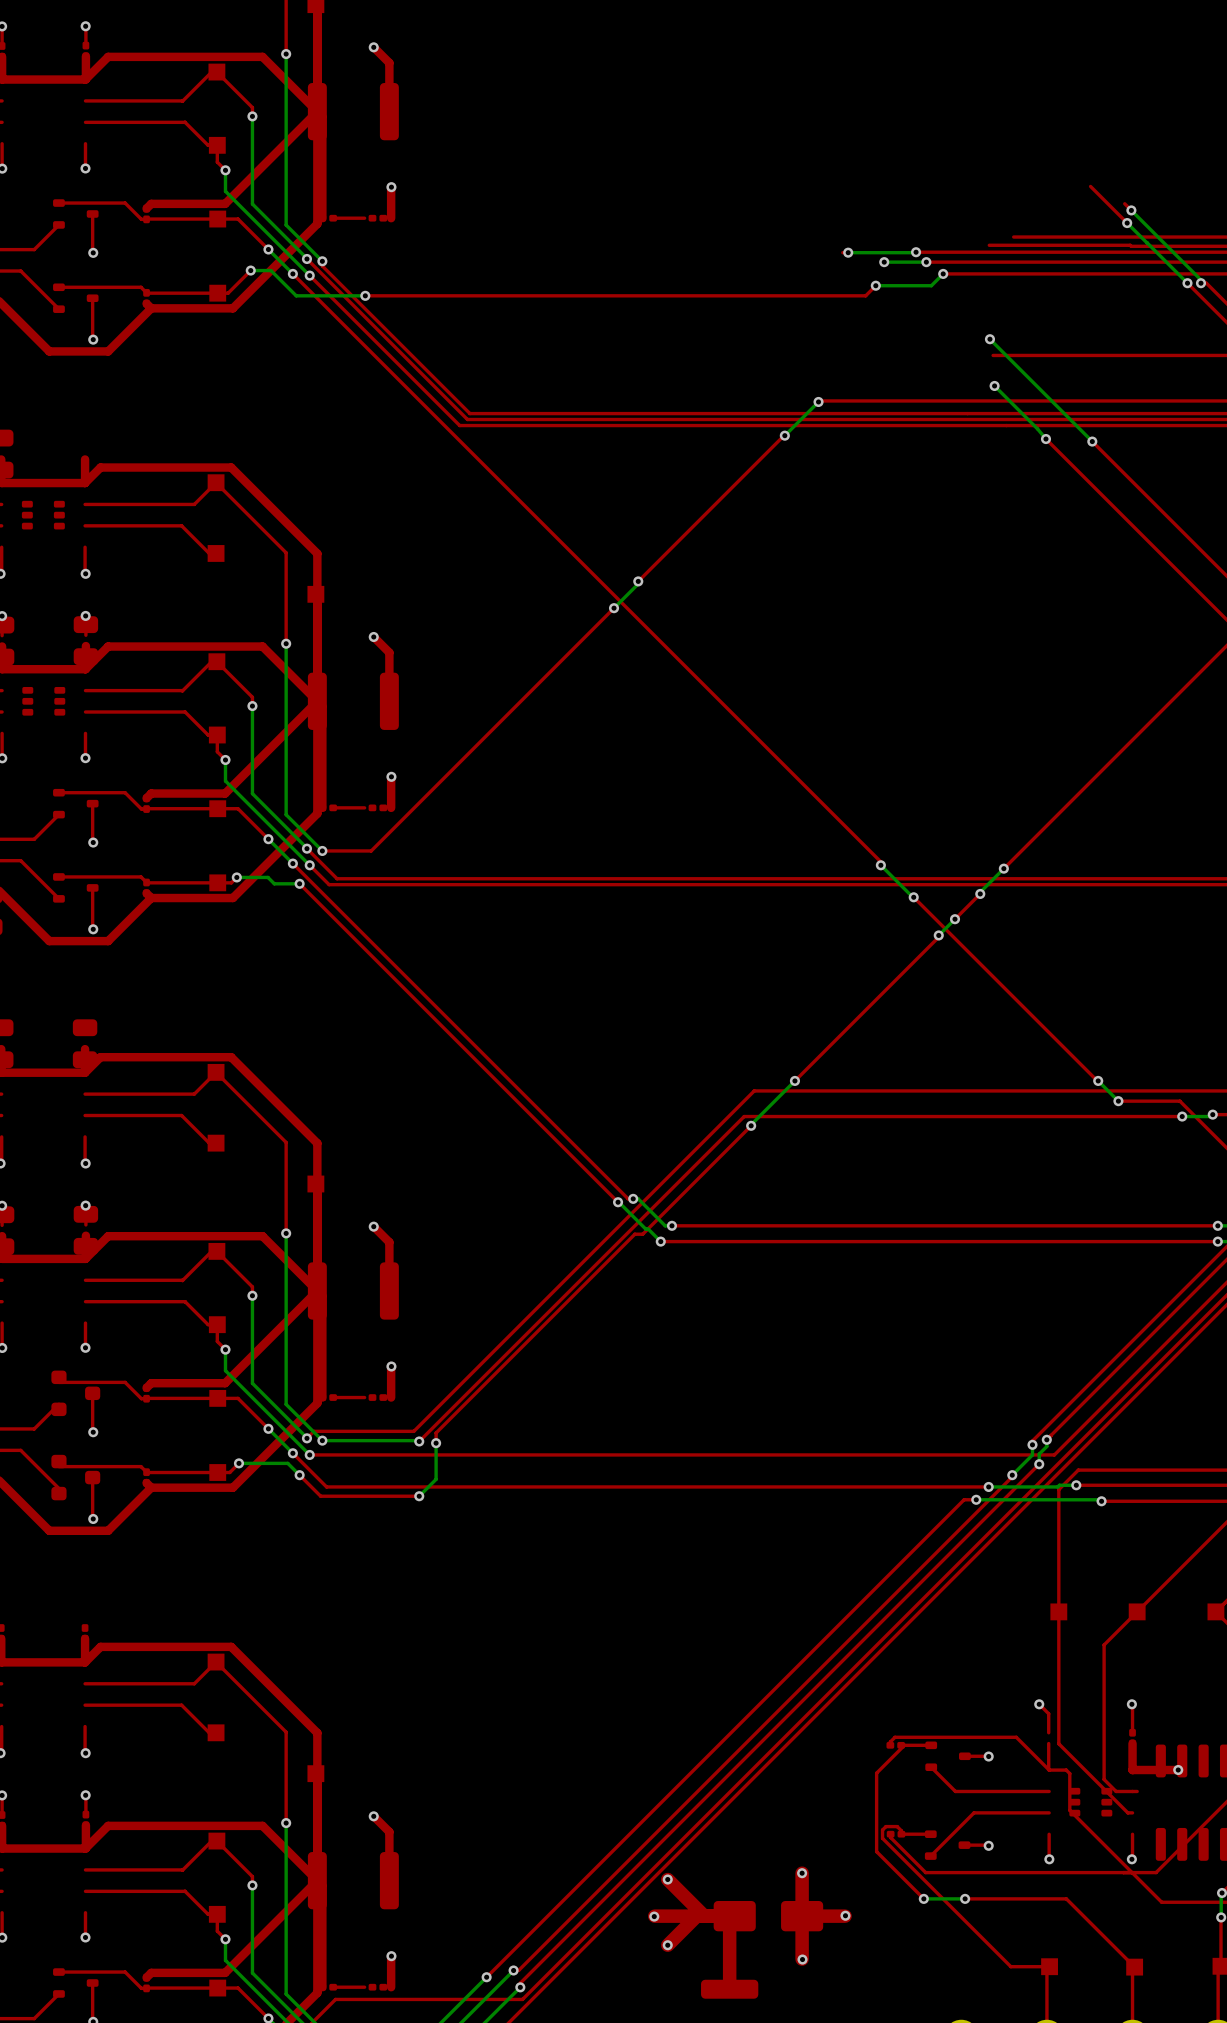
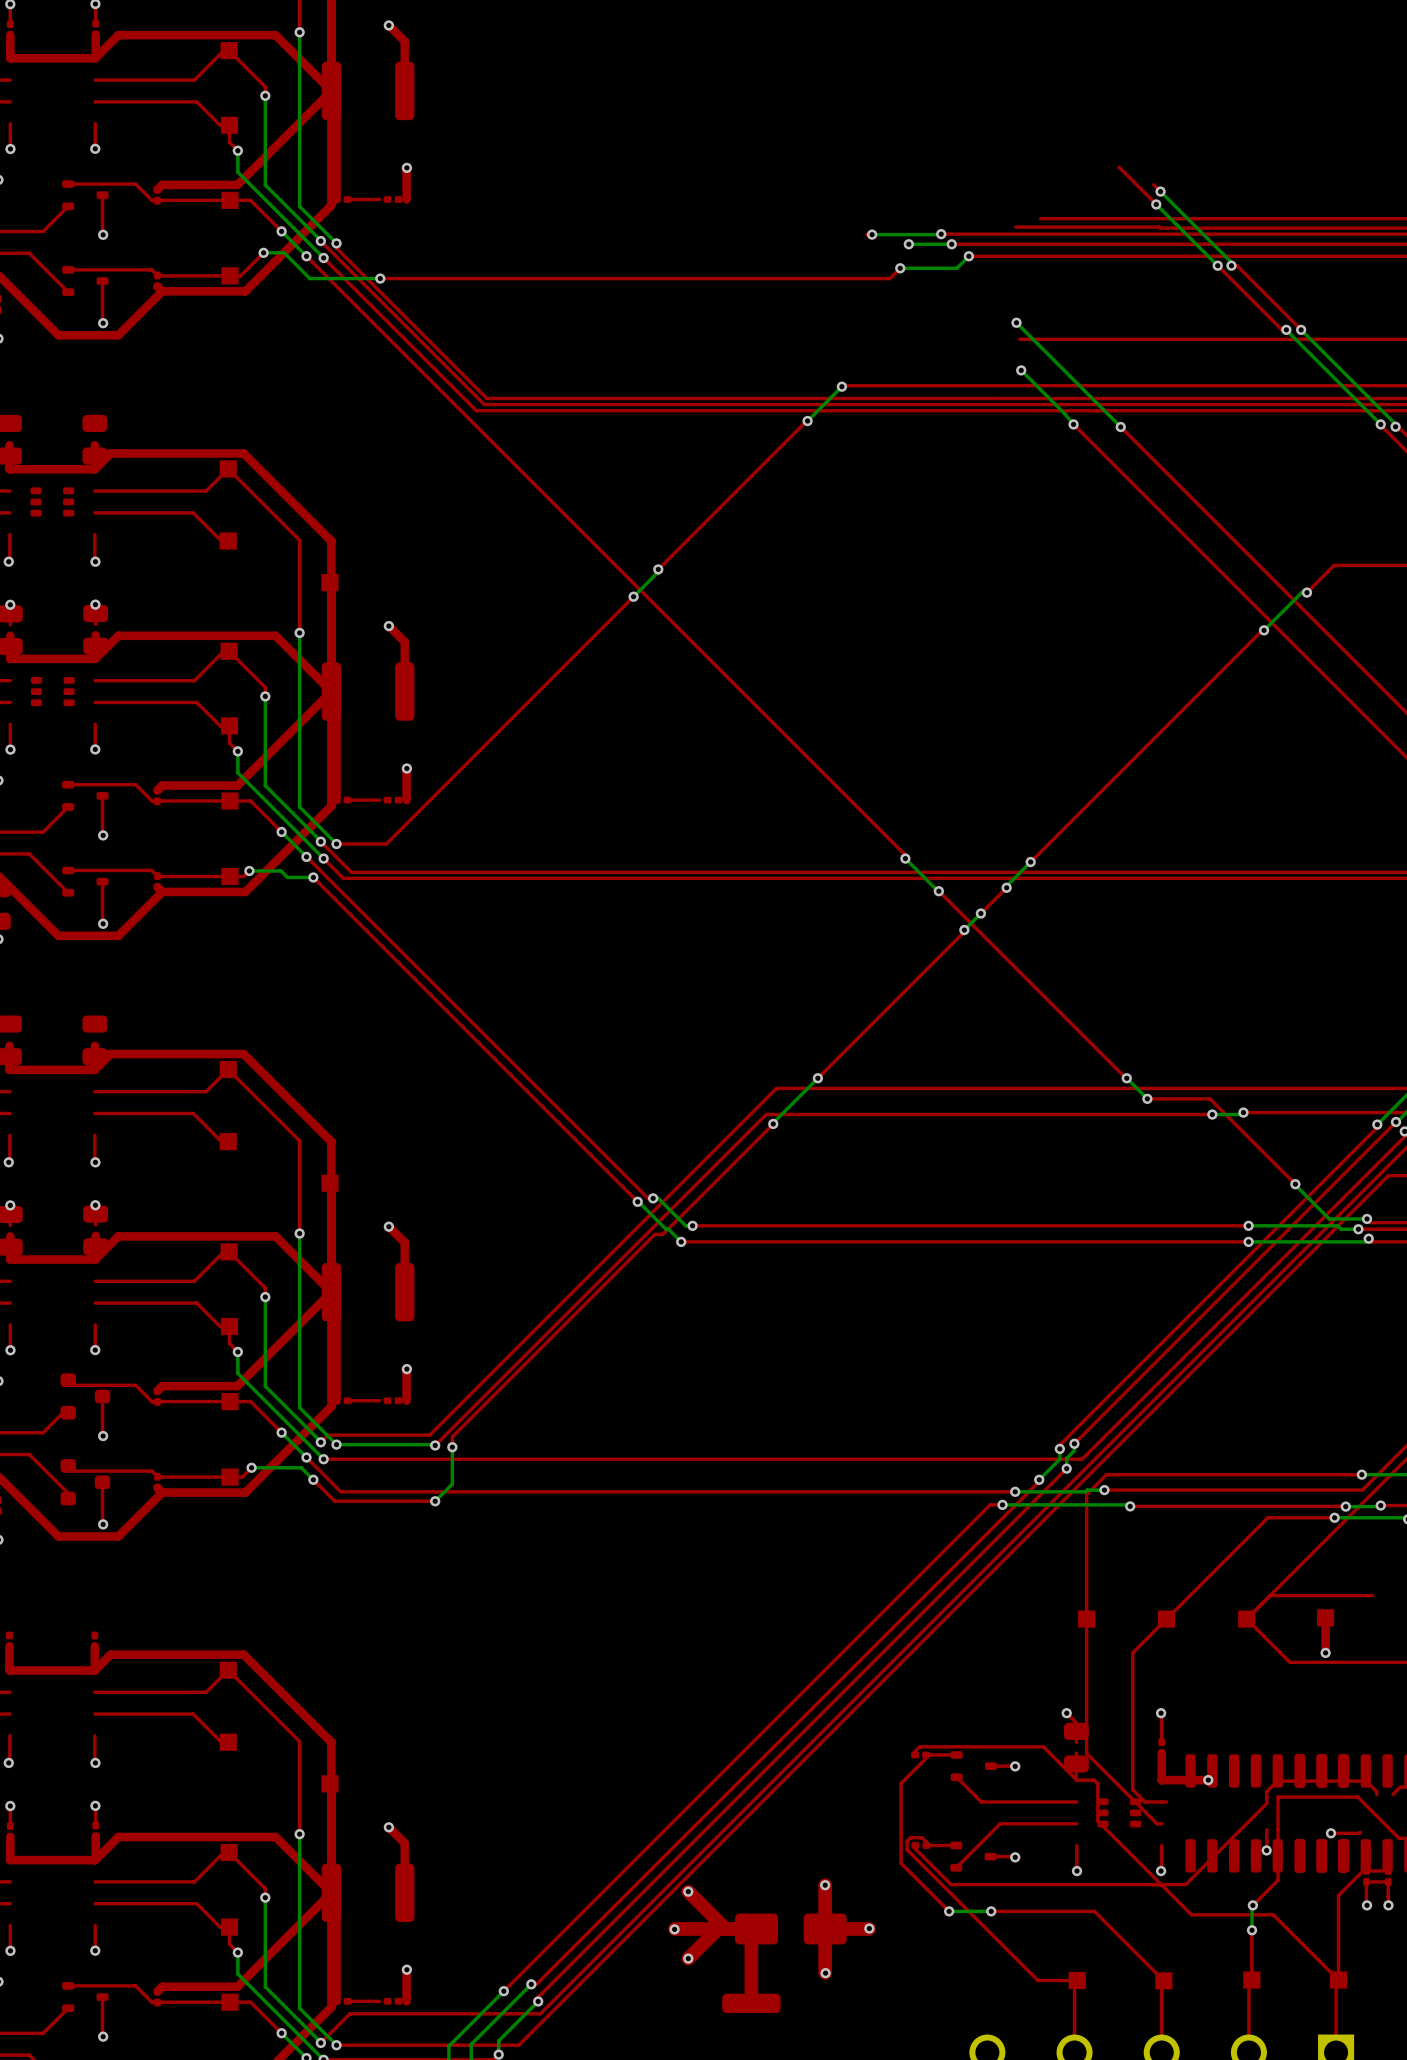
part: none -> (94, 439)
part: none -> (1076, 1747)

